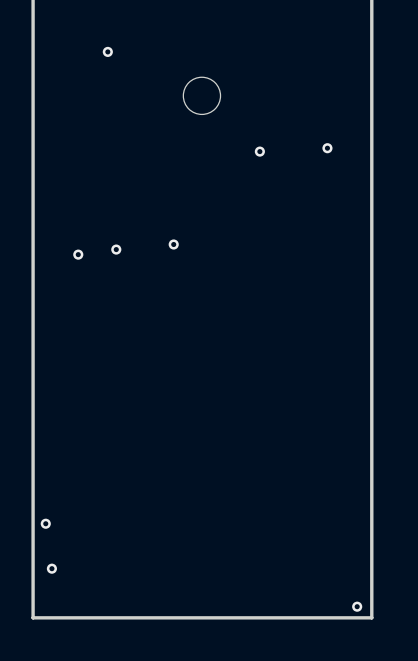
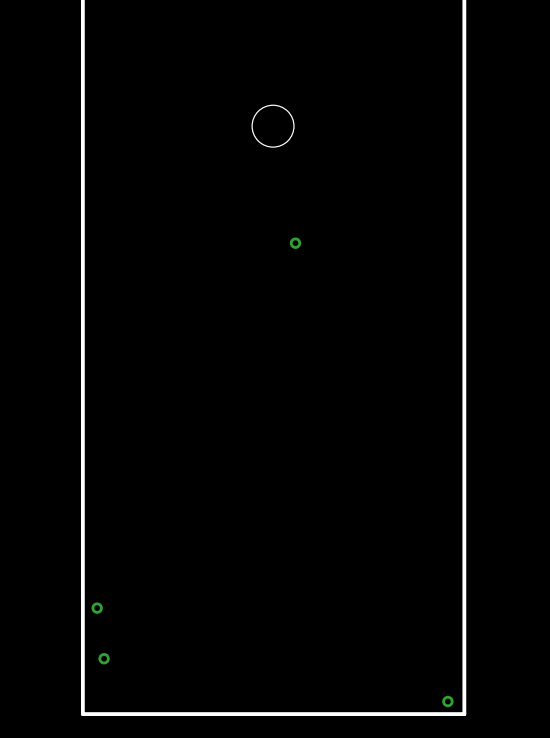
via: (107, 51) -> none
via: (327, 148) -> none
via: (259, 151) -> none
via: none -> (295, 243)
via: (173, 244) -> none
via: (116, 249) -> none
via: (78, 254) -> none

